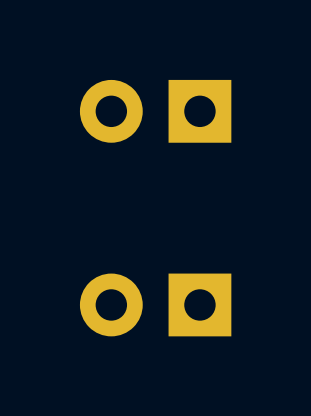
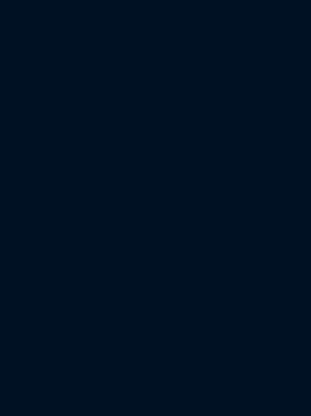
part: (155, 111) -> none
part: (155, 304) -> none

